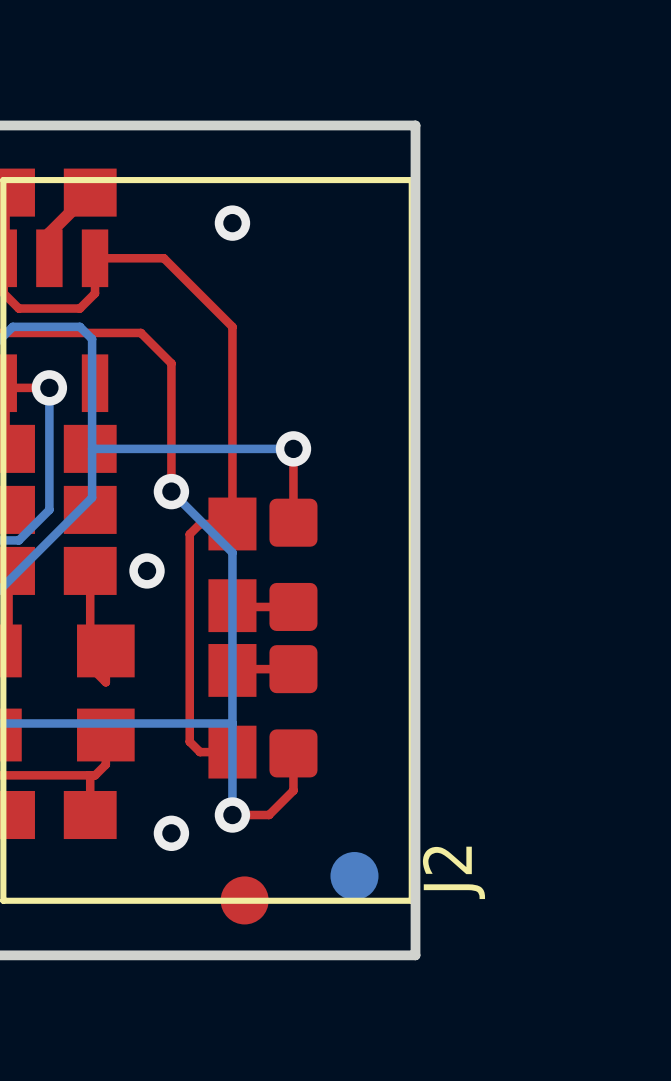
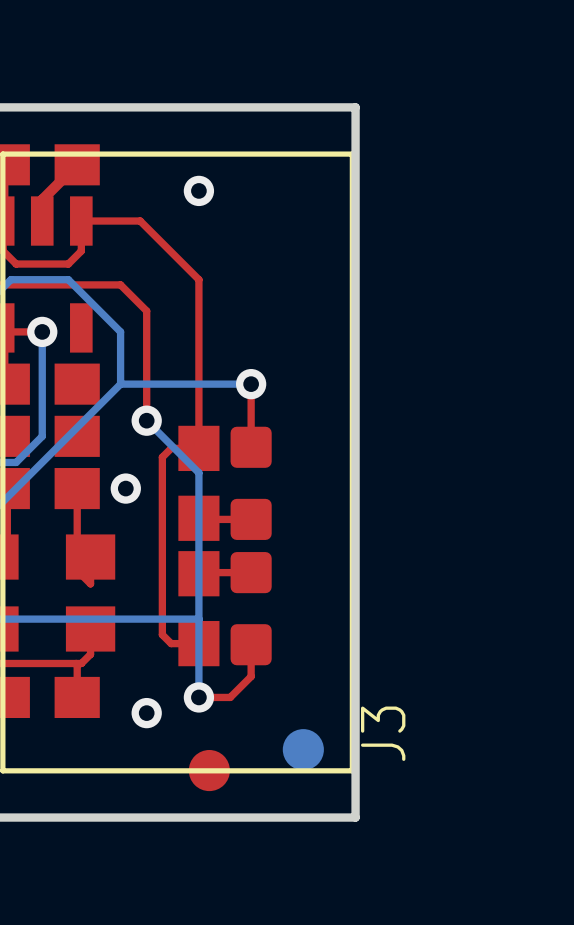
bottom track: (92, 339) (92, 497) -> (78, 290) (120, 331) (120, 384) (78, 425)
bottom track: (140, 448) (92, 448) -> none
J2 name: J2 (453, 872) -> J3 (383, 733)

